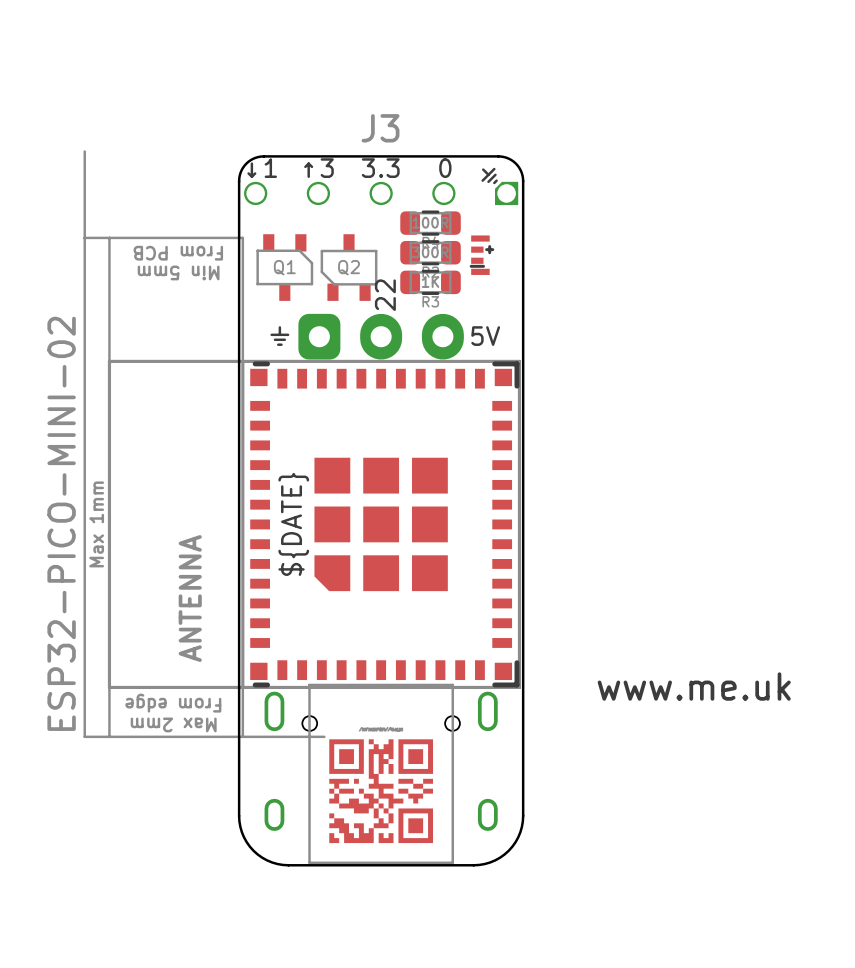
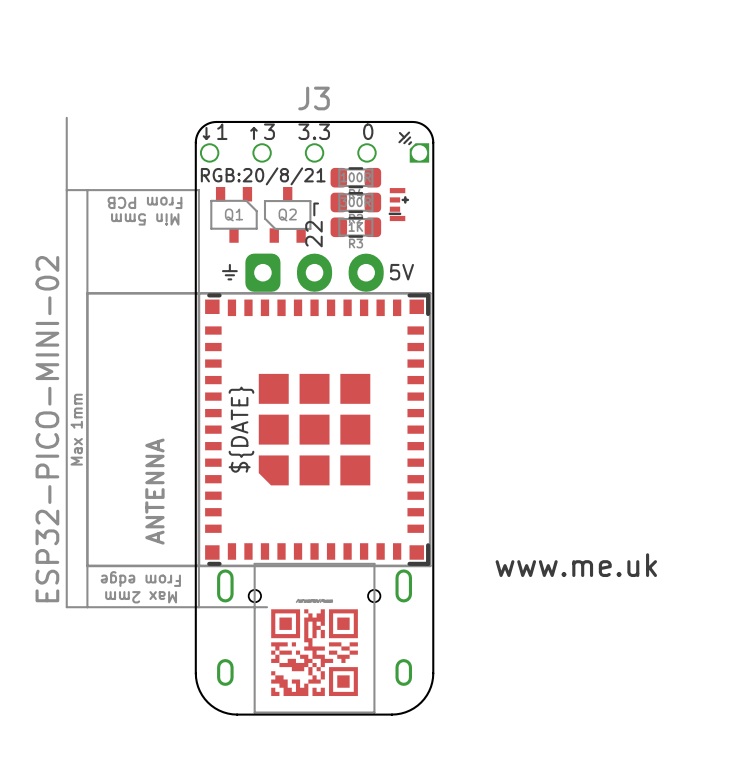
text: none -> RGB:20/8/21 (263, 176)
text: 22 (385, 295) -> 22¬ (313, 224)

